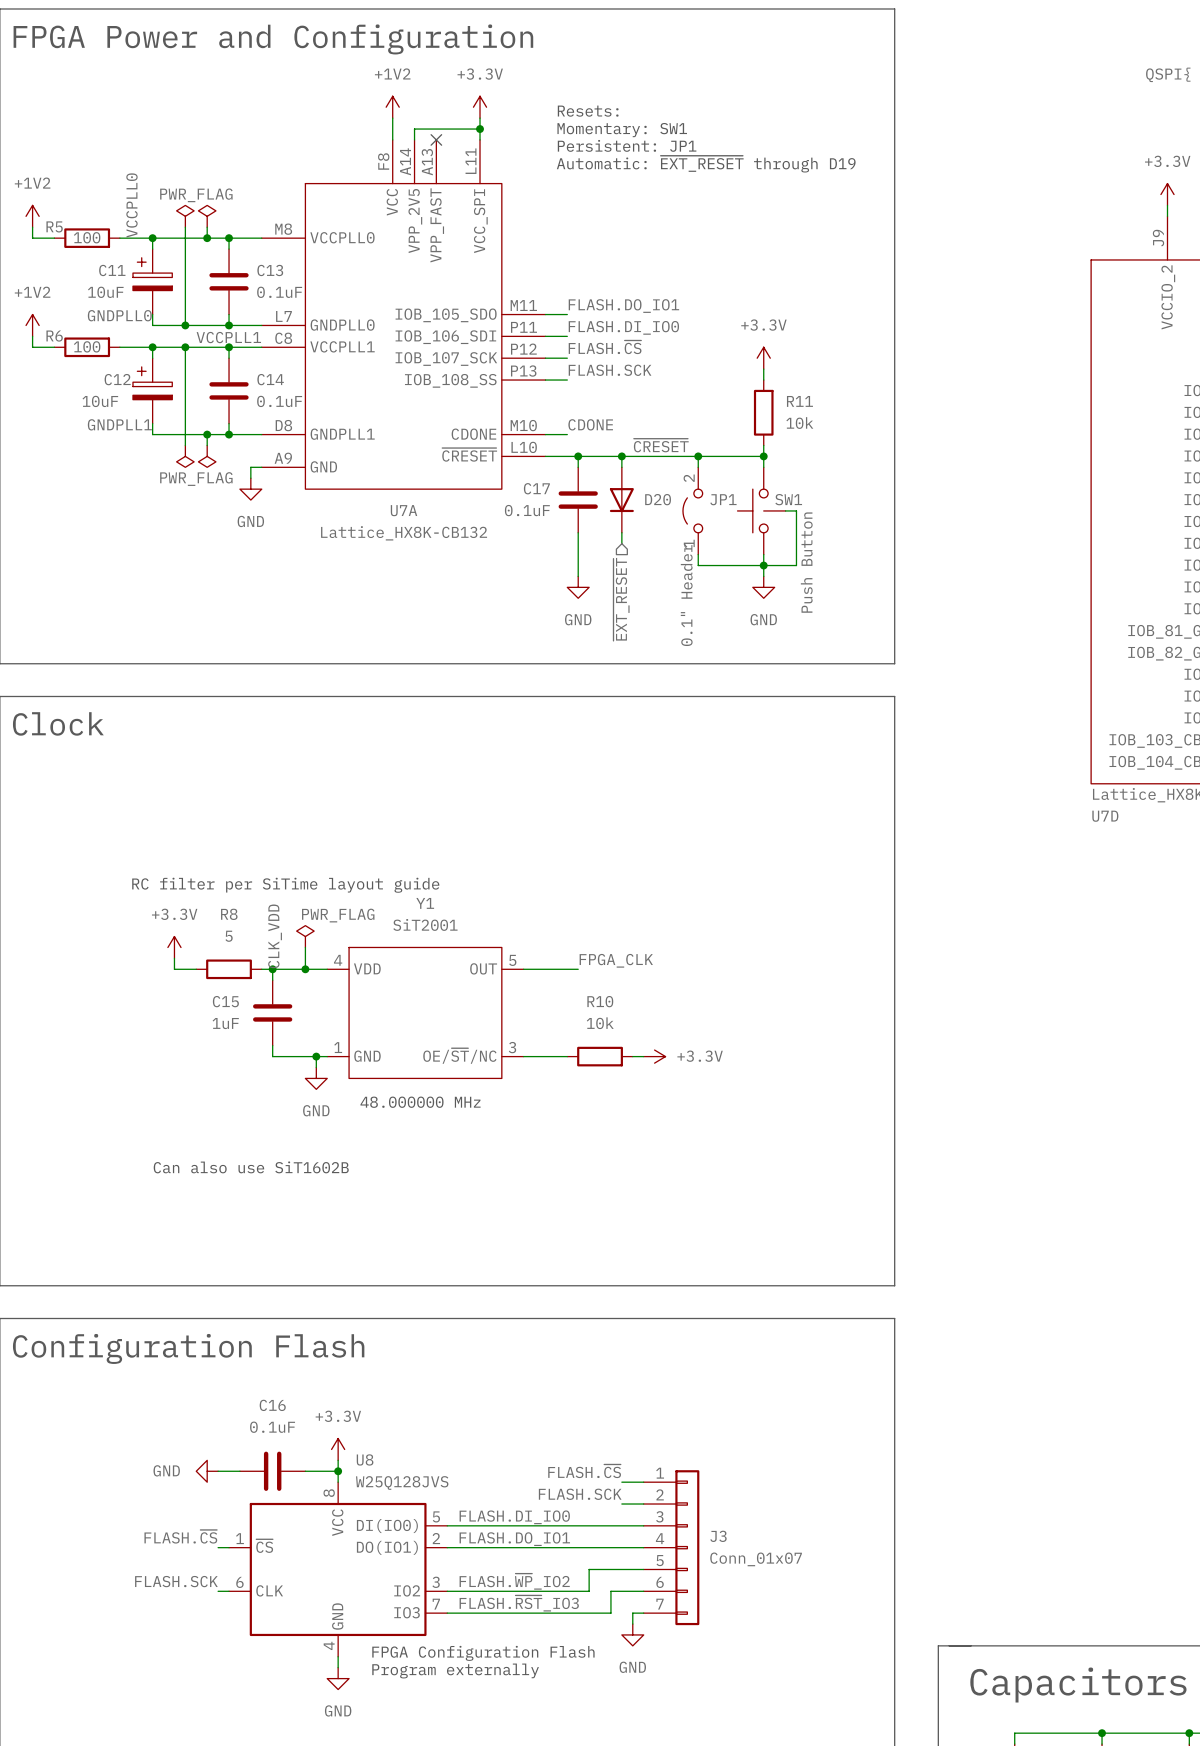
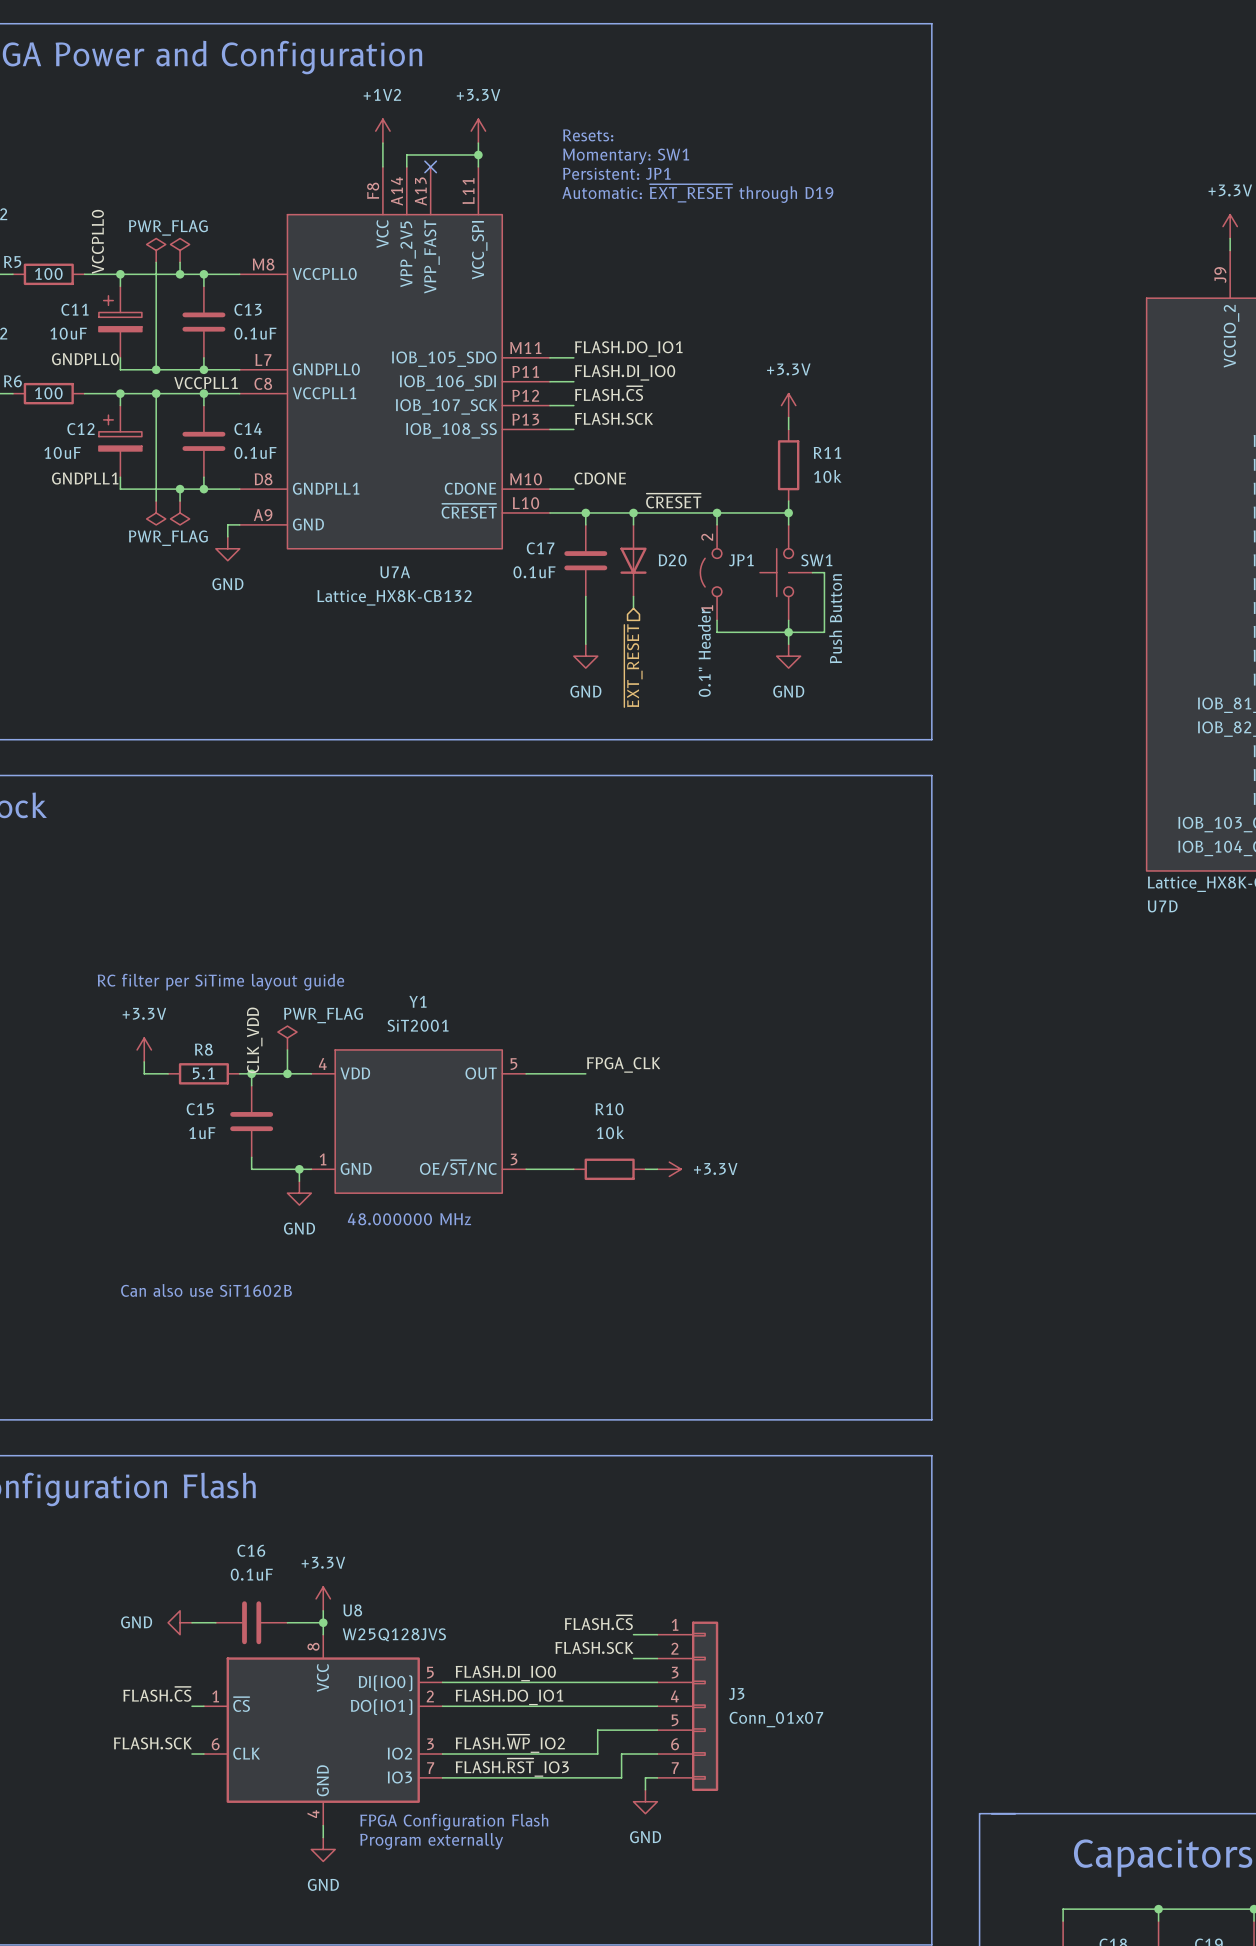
R8 name position: R8 (229, 914) -> R8 (203, 1049)
R8 value: 5 (229, 936) -> 5.1 (203, 1073)

